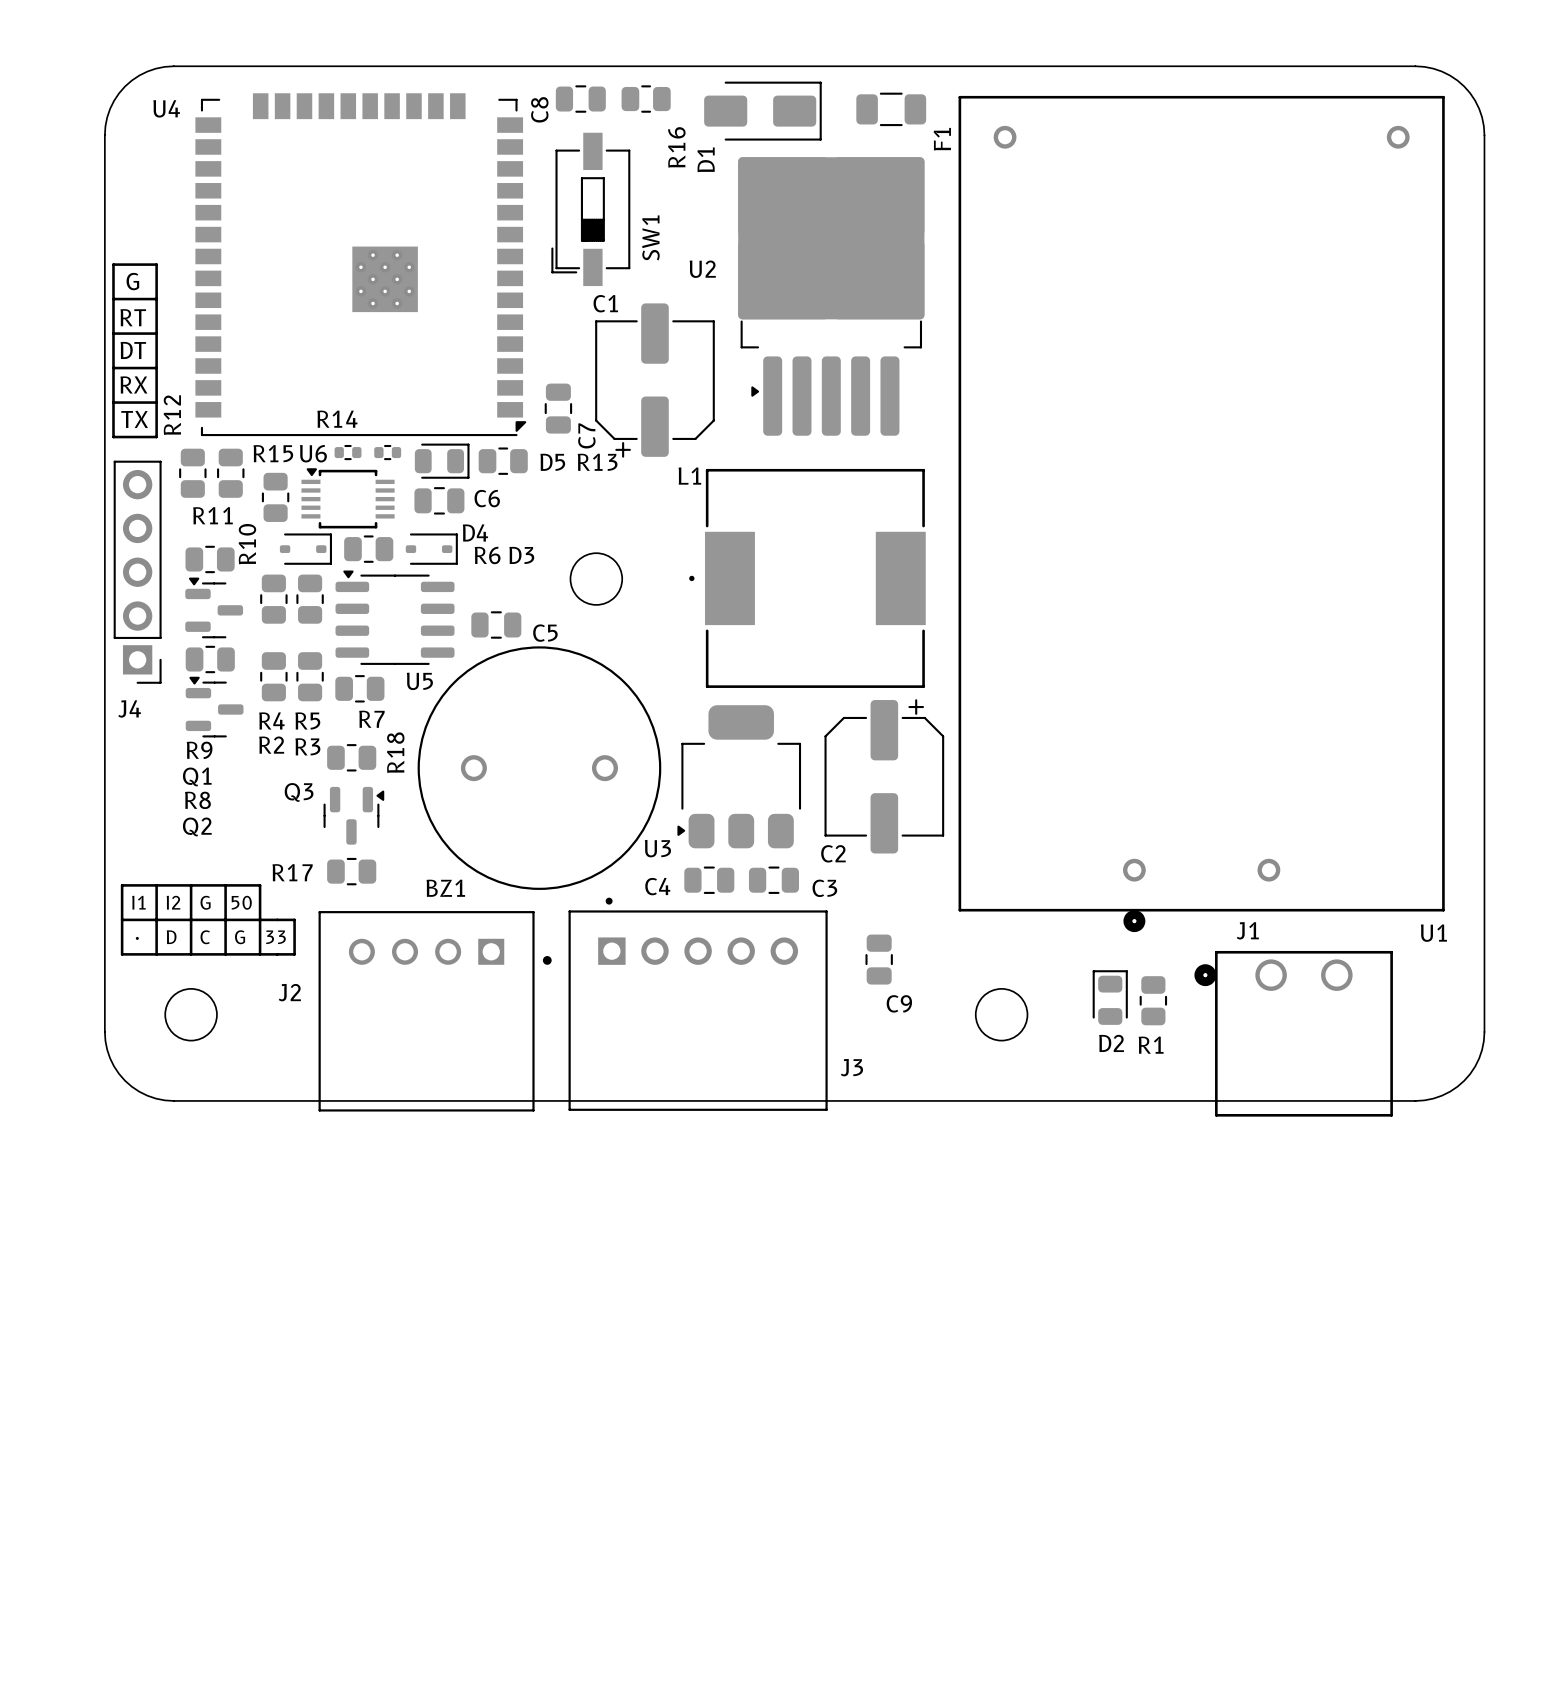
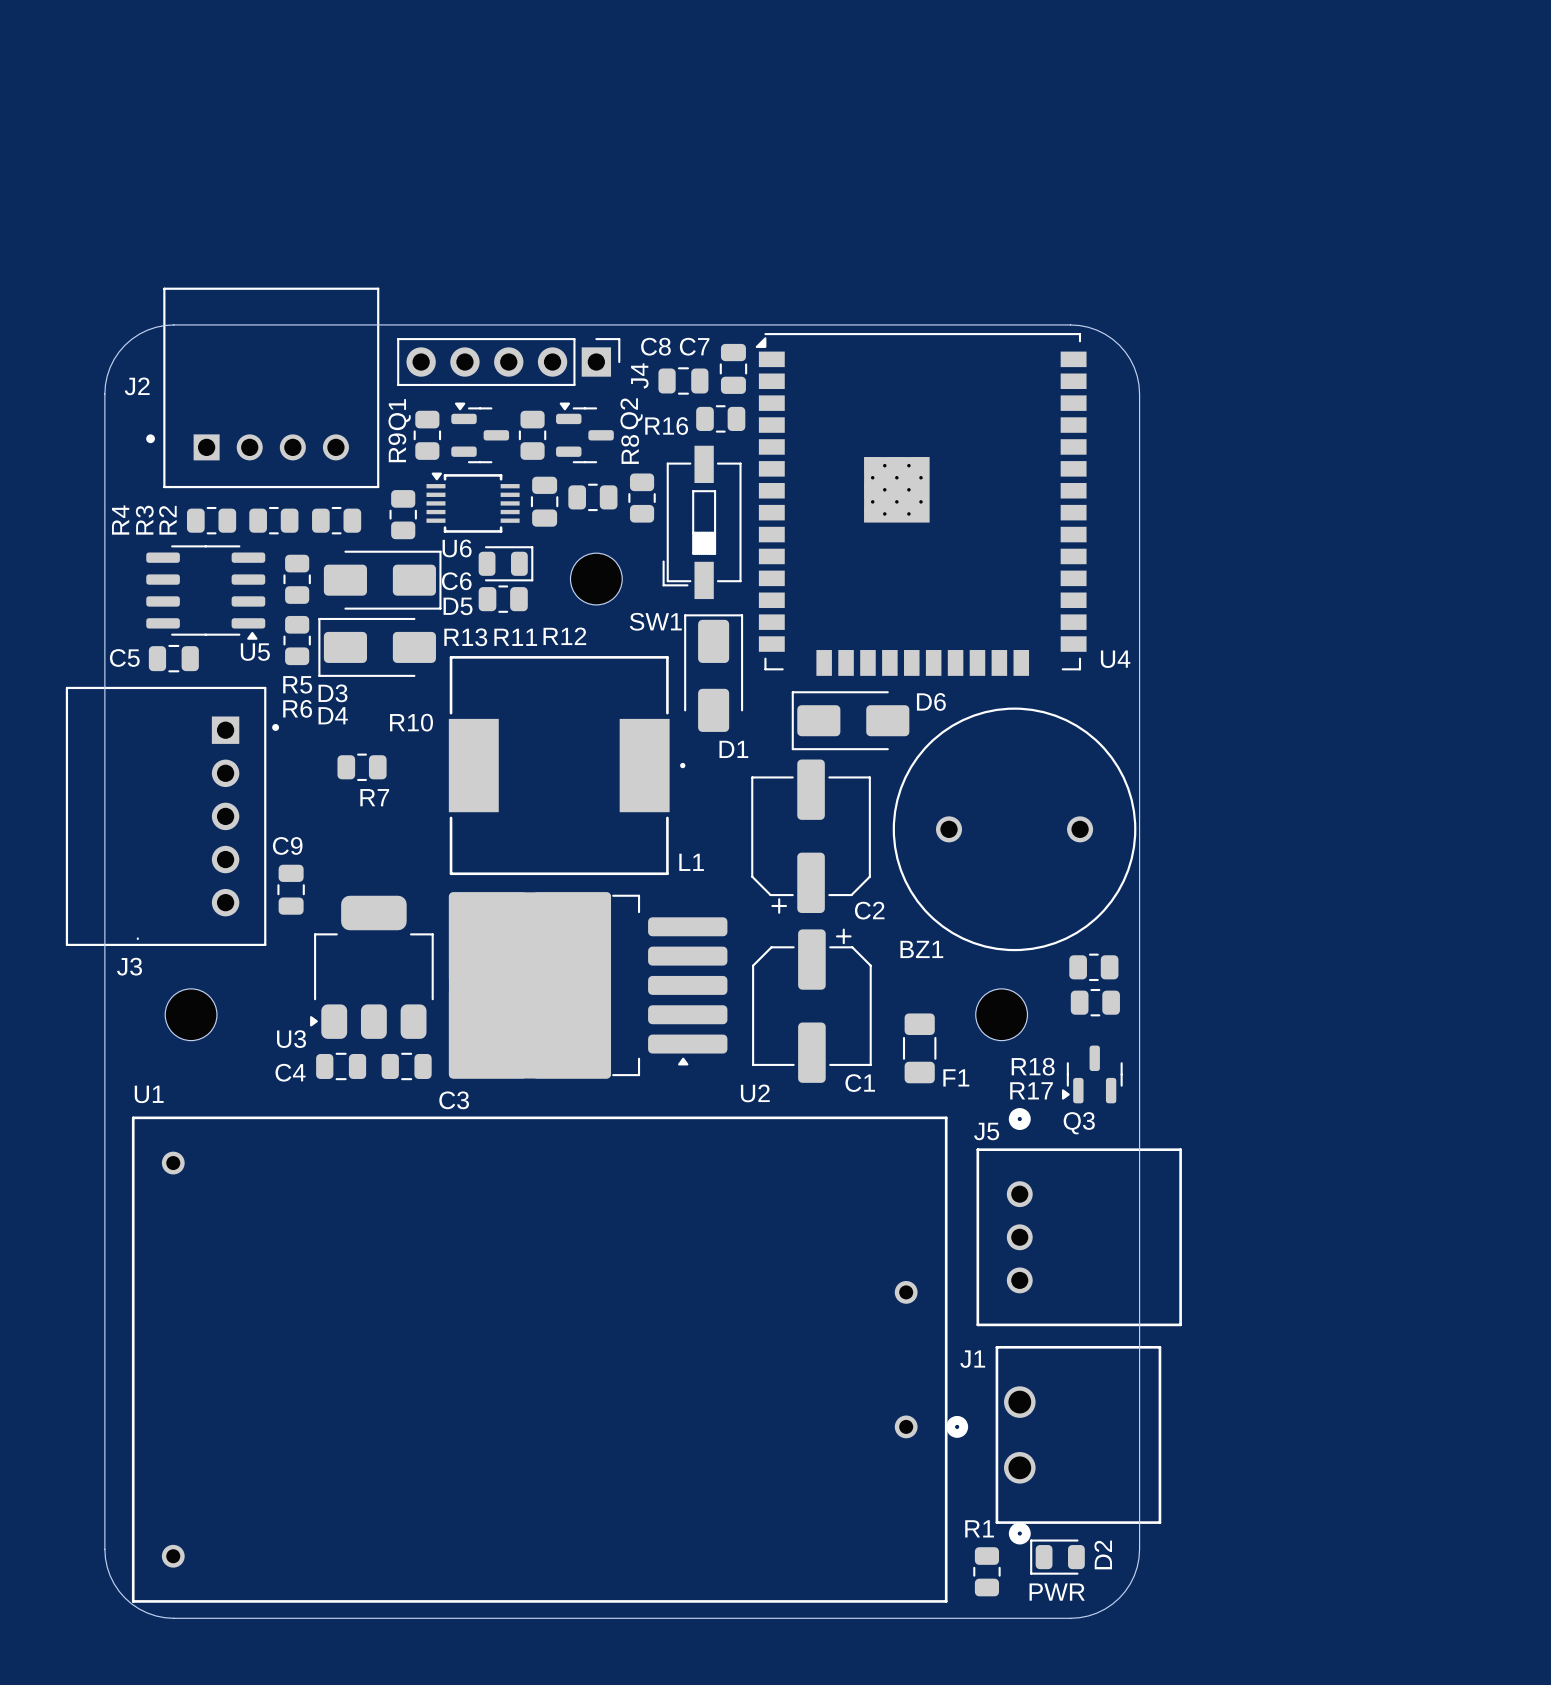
C8 position: (580, 99) -> (683, 380)
R16 position: (646, 99) -> (720, 418)
C8 name rotation: 0° (539, 109) -> 90° clockwise (655, 346)
C8 name position: C8 (539, 109) -> C8 (655, 346)
F1 rotation: 0° (891, 109) -> 90° clockwise (919, 1048)
F1 position: (891, 109) -> (919, 1048)
D1 rotation: 0° (762, 111) -> 90° counterclockwise (713, 673)
D1 position: (762, 111) -> (713, 673)
R16 name rotation: 0° (676, 147) -> 90° clockwise (666, 426)
R16 name position: R16 (676, 147) -> R16 (666, 426)
D1 name position: D1 (706, 159) -> D1 (733, 749)
SW1 position: (590, 209) -> (702, 522)
SW1 name rotation: 0° (650, 237) -> 90° clockwise (655, 621)
SW1 name position: SW1 (650, 237) -> SW1 (655, 621)
line: (113, 264) (113, 437) (156, 437) (156, 264) (113, 264) -> none
U4 rotation: 0° (360, 264) -> 180° (921, 504)
U4 position: (360, 264) -> (921, 504)
U2 name position: U2 (702, 269) -> U2 (755, 1093)
text: G (132, 281) -> none
U2 rotation: 0° (831, 296) -> 90° counterclockwise (588, 985)
U2 position: (831, 296) -> (588, 985)
line: (113, 299) (156, 299) -> none
text: RT (133, 317) -> none
line: (113, 333) (156, 333) -> none
text: DT (133, 350) -> none
line: (113, 368) (156, 368) -> none
C1 rotation: 0° (654, 380) -> 180° (811, 1005)
C1 position: (654, 380) -> (811, 1005)
text: RX (133, 384) -> none
board edge: (104, 393) (105, 126) (110, 108) (125, 86) (147, 71) (164, 66) (1415, 66) (1441, 71) (1464, 86) (1479, 108) (1483, 126) (1484, 1031) (1482, 1049) (1475, 1066) (1464, 1080) (1449, 1091) (1433, 1098) (1415, 1100) (173, 1100) (147, 1095) (125, 1080) (110, 1058) (104, 1031) -> (104, 393) (110, 367) (125, 345) (147, 330) (173, 324) (1070, 324) (1088, 327) (1105, 334) (1125, 351) (1134, 367) (1139, 393) (1139, 1549) (1137, 1567) (1130, 1583) (1119, 1598) (1105, 1609) (1088, 1615) (1070, 1618) (173, 1618) (156, 1615) (139, 1609) (125, 1598) (114, 1583) (107, 1567) (104, 1549) (104, 1031)
line: (113, 402) (156, 402) -> none
C7 position: (558, 408) -> (733, 368)
R12 name rotation: 0° (172, 415) -> 90° clockwise (564, 636)
R12 name position: R12 (172, 415) -> R12 (564, 636)
text: TX (134, 419) -> none
C7 name rotation: 0° (586, 435) -> 90° clockwise (694, 346)
C7 name position: C7 (586, 435) -> C7 (694, 346)
R15: (348, 452) -> none
R14: (387, 452) -> none
U6 name position: U6 (313, 453) -> U6 (457, 548)
D5 position: (442, 461) -> (505, 563)
R13 position: (503, 461) -> (503, 599)
D5 name position: D5 (552, 462) -> D5 (458, 606)
R13 name position: R13 (597, 462) -> R13 (465, 637)
R12 position: (192, 473) -> (642, 498)
R11 rotation: 0° (230, 473) -> 90° clockwise (592, 497)
R11 position: (230, 473) -> (592, 497)
R10 position: (275, 497) -> (403, 514)
U6 position: (348, 498) -> (473, 502)
C6 name position: C6 (487, 498) -> C6 (456, 581)
C6 rotation: 0° (439, 500) -> 90° clockwise (544, 501)
C6 position: (439, 500) -> (544, 501)
U1 rotation: 0° (1201, 514) -> 90° counterclockwise (550, 1359)
U1 position: (1201, 514) -> (550, 1359)
R11 name position: R11 (212, 515) -> R11 (515, 637)
D4 name position: D4 (475, 532) -> D4 (333, 715)
D4 footprint: [279, 533, 332, 565] -> [318, 617, 436, 677]
D3 footprint: [405, 533, 458, 565] -> [323, 550, 442, 610]
R10 name rotation: 0° (247, 544) -> 90° clockwise (411, 722)
R10 name position: R10 (247, 544) -> R10 (411, 722)
R6 rotation: 0° (368, 549) -> 90° clockwise (297, 640)
R6 position: (368, 549) -> (297, 640)
R6 name position: R6 (487, 555) -> R6 (297, 708)
D3 name position: D3 (521, 555) -> D3 (332, 693)
R9 rotation: 0° (210, 559) -> 90° clockwise (427, 435)
R9 position: (210, 559) -> (427, 435)
J4 rotation: 0° (137, 572) -> 90° counterclockwise (508, 362)
J4 position: (137, 572) -> (508, 362)
L1 rotation: 0° (807, 578) -> 180° (567, 765)
L1 position: (807, 578) -> (567, 765)
R4 rotation: 0° (273, 599) -> 90° clockwise (211, 520)
R4 position: (273, 599) -> (211, 520)
R5 position: (310, 599) -> (297, 579)
Q1 position: (214, 607) -> (480, 432)
U5 rotation: 0° (395, 617) -> 180° (205, 592)
U5 position: (395, 617) -> (205, 592)
C5 position: (496, 625) -> (173, 658)
C5 name position: C5 (545, 633) -> C5 (124, 657)
R8 rotation: 0° (210, 659) -> 90° clockwise (532, 435)
R8 position: (210, 659) -> (532, 435)
R2 rotation: 0° (273, 676) -> 90° clockwise (336, 520)
R2 position: (273, 676) -> (336, 520)
R3 rotation: 0° (310, 676) -> 90° clockwise (273, 520)
R3 position: (310, 676) -> (273, 520)
R7 position: (359, 688) -> (362, 767)
C2 footprint: [824, 699, 945, 854] -> [751, 759, 871, 914]
Q2 position: (214, 707) -> (584, 432)
R5 name position: R5 (307, 720) -> R5 (297, 684)
D6: none -> (850, 720)
R2 name position: R2 (271, 745) -> R2 (167, 520)
R3 name position: R3 (307, 746) -> R3 (144, 520)
R9 name position: R9 (199, 750) -> R9 (397, 447)
R18 name rotation: 0° (395, 752) -> 90° clockwise (1033, 1066)
R18 name position: R18 (395, 752) -> R18 (1033, 1066)
R18 position: (351, 757) -> (1095, 1002)
BZ1 position: (539, 768) -> (1014, 829)
Q1 name rotation: 0° (197, 776) -> 90° counterclockwise (399, 414)
Q1 name position: Q1 (197, 776) -> Q1 (399, 414)
U3 position: (739, 776) -> (371, 967)
Q3 name position: Q3 (299, 792) -> Q3 (1079, 1123)
R8 name position: R8 (197, 800) -> R8 (630, 449)
Q3 rotation: 0° (353, 815) -> 180° (1092, 1074)
Q3 position: (353, 815) -> (1092, 1074)
Q2 name rotation: 0° (197, 826) -> 90° counterclockwise (631, 413)
Q2 name position: Q2 (197, 826) -> Q2 (631, 413)
C2 name position: C2 (833, 853) -> C2 (869, 910)
R17 position: (351, 871) -> (1093, 967)
R17 name position: R17 (292, 872) -> R17 (1031, 1090)
C4 position: (709, 880) -> (341, 1066)
C3 position: (773, 880) -> (406, 1066)
line: (156, 885) (156, 954) -> none
line: (191, 885) (191, 954) -> none
line: (225, 885) (225, 954) -> none
C3 name position: C3 (824, 888) -> C3 (454, 1100)
text: I1 (138, 902) -> none
text: I2 (173, 902) -> none
text: G (205, 902) -> none
text: 50 (241, 902) -> none
line: (122, 919) (294, 919) (294, 954) (122, 954) (122, 885) (260, 885) (260, 954) -> none
J1 name position: J1 (1247, 930) -> J1 (972, 1359)
U1 name position: U1 (1433, 933) -> U1 (149, 1094)
text: D (171, 937) -> none
text: C (205, 937) -> none
text: G (240, 937) -> none
text: 33 (275, 937) -> none
C9 position: (879, 959) -> (291, 889)
D2 rotation: 0° (1110, 997) -> 90° counterclockwise (1057, 1557)
D2 position: (1110, 997) -> (1057, 1557)
R1 position: (1153, 1000) -> (986, 1571)
C9 name position: C9 (899, 1003) -> C9 (287, 845)
J3 rotation: 0° (698, 1004) -> 90° clockwise (172, 816)
J3 position: (698, 1004) -> (172, 816)
J2 rotation: 0° (435, 1011) -> 180° (262, 387)
J2 position: (435, 1011) -> (262, 387)
J1 rotation: 0° (1293, 1033) -> 90° counterclockwise (1078, 1445)
J1 position: (1293, 1033) -> (1078, 1445)
R1 name position: R1 (1151, 1045) -> R1 (979, 1528)
J5: none -> (1079, 1217)
text: none -> PWR (1057, 1592)

